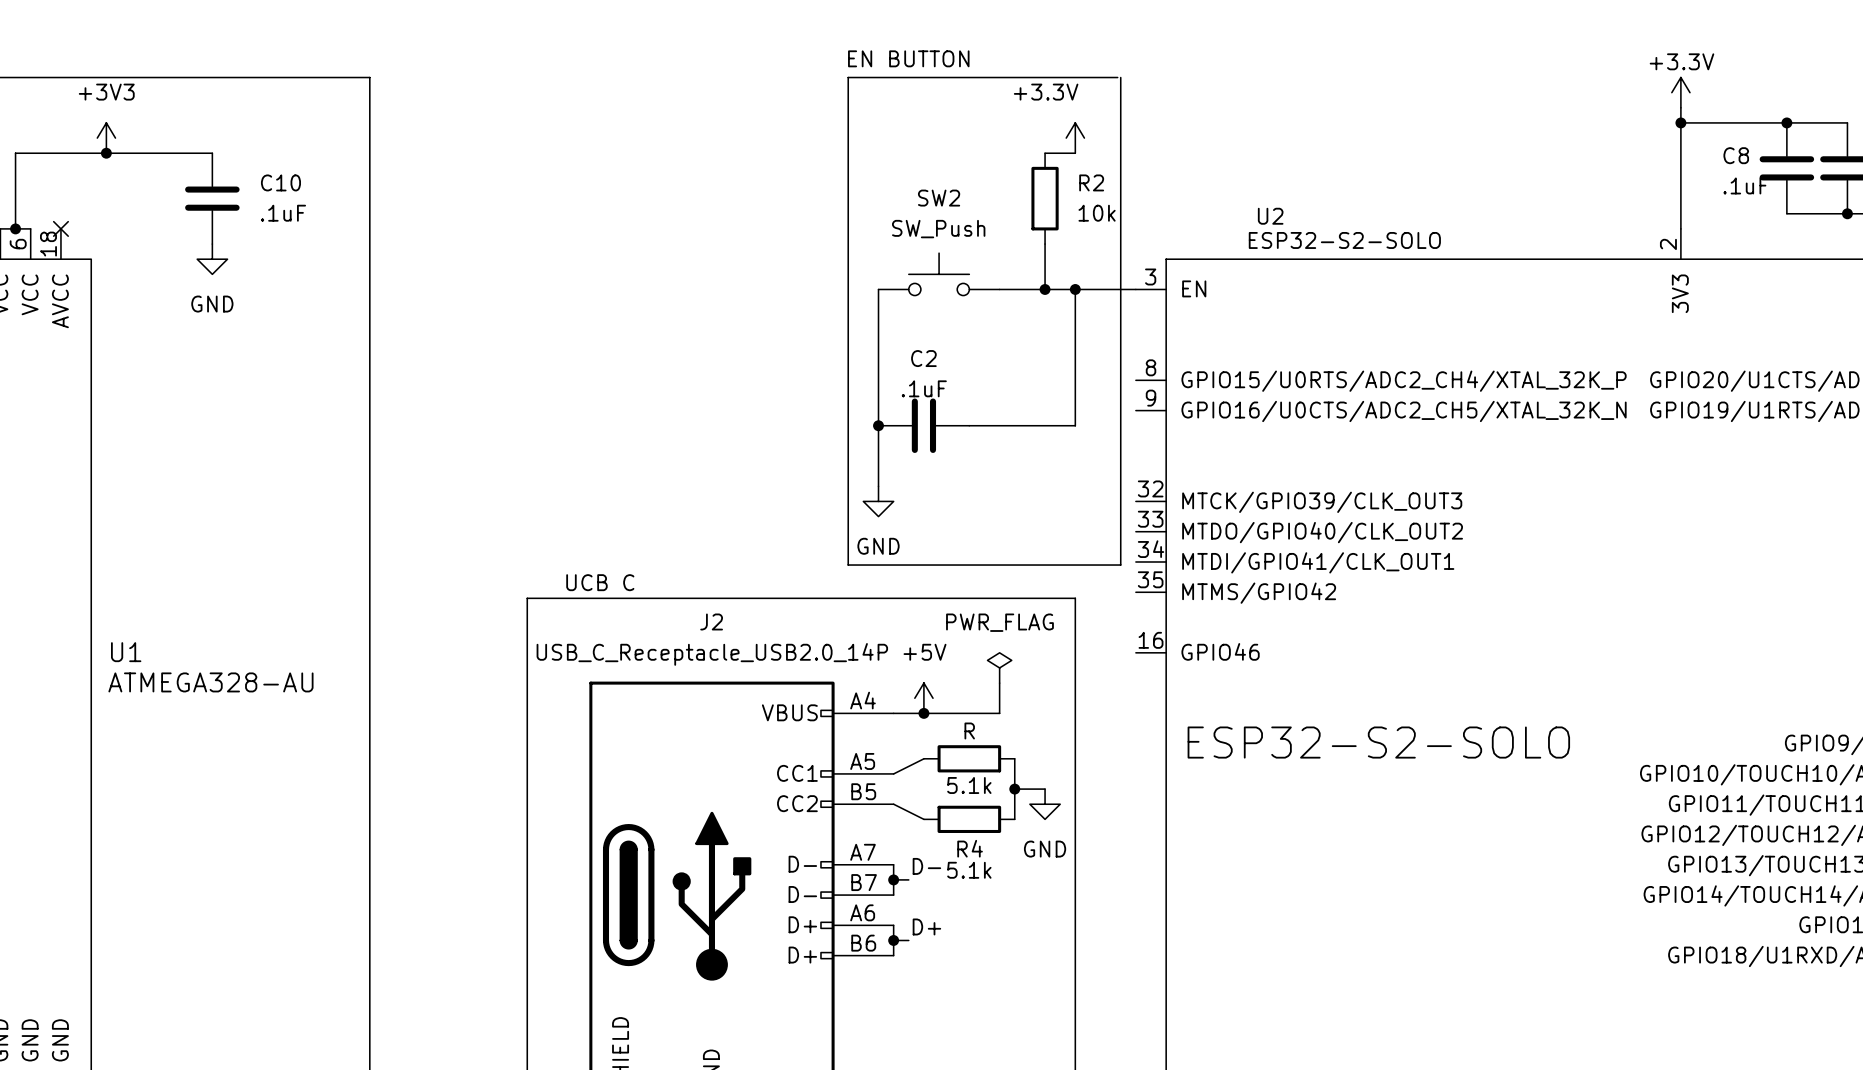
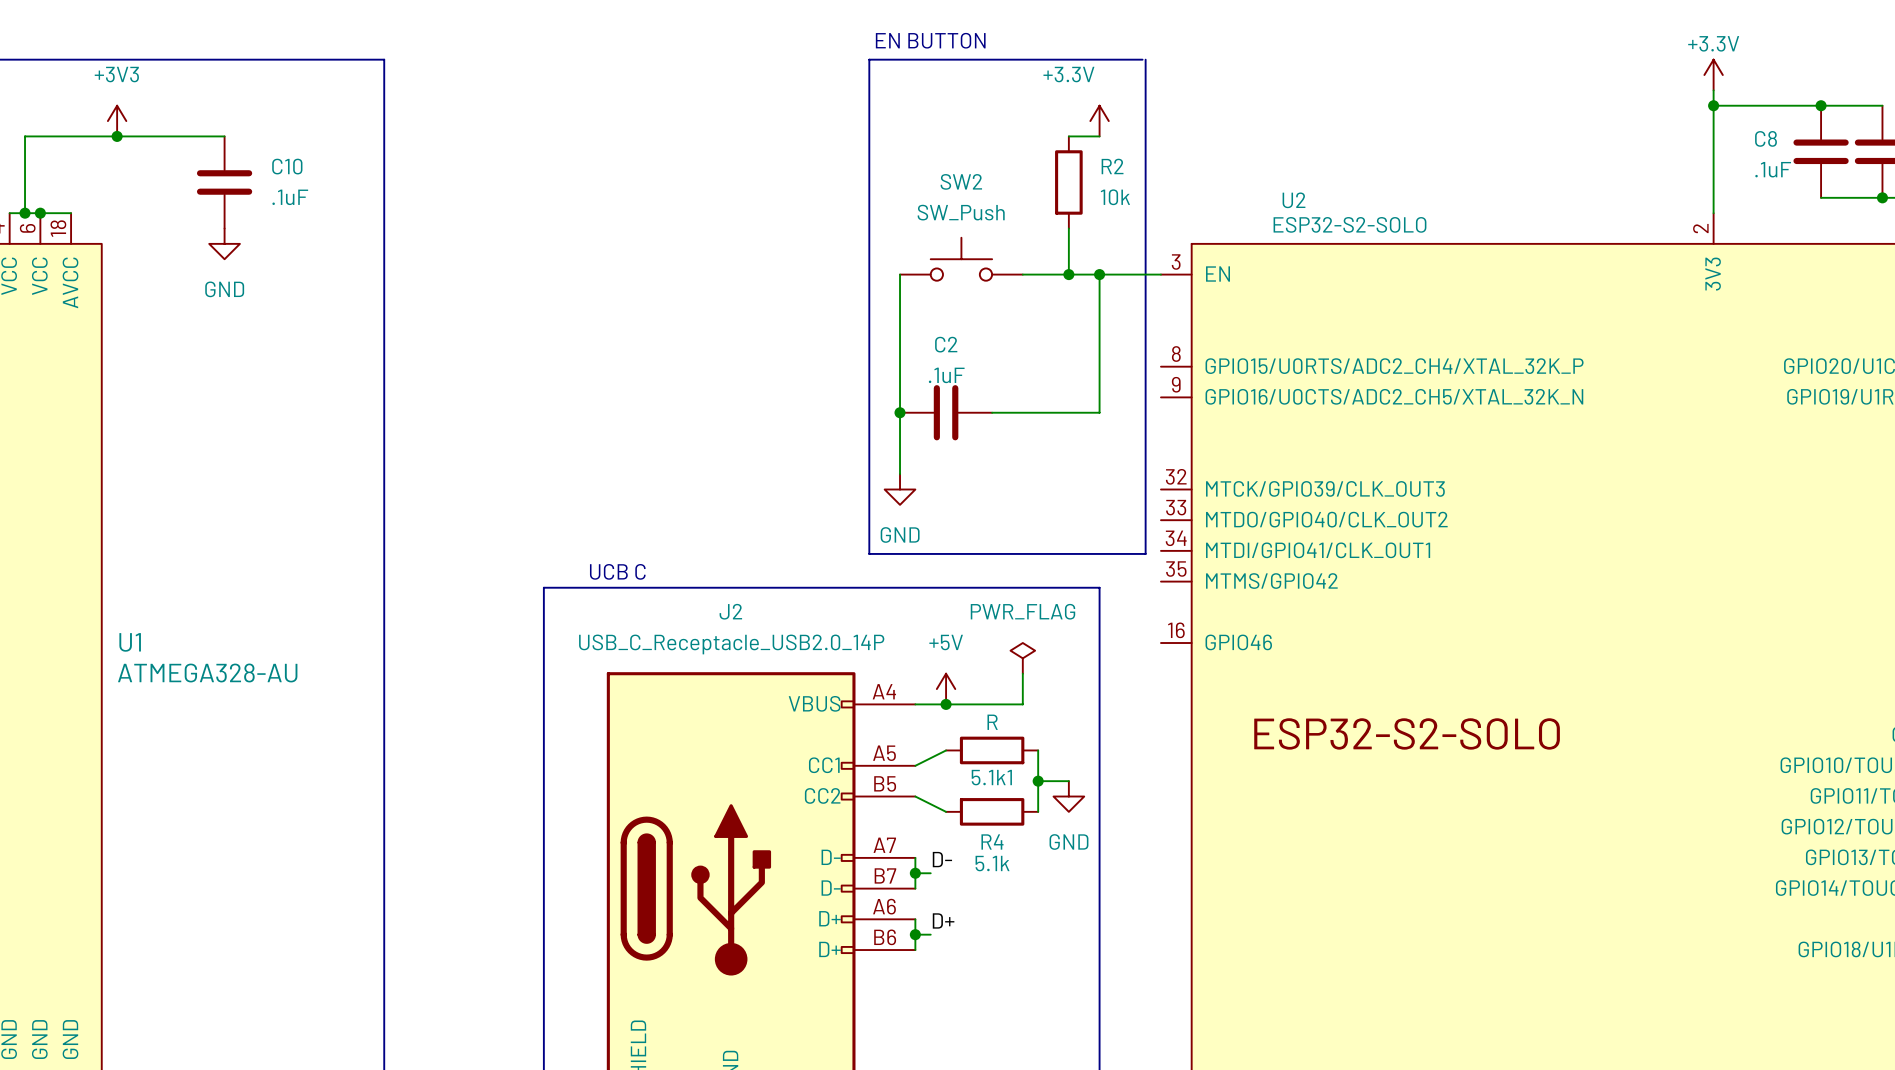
wire: none -> (40, 213) (71, 213)
junction: none -> (40, 213)
no-connect mark: (60, 228) -> none
5.1k name: 5.1k (969, 785) -> 5.1k1 (991, 777)

